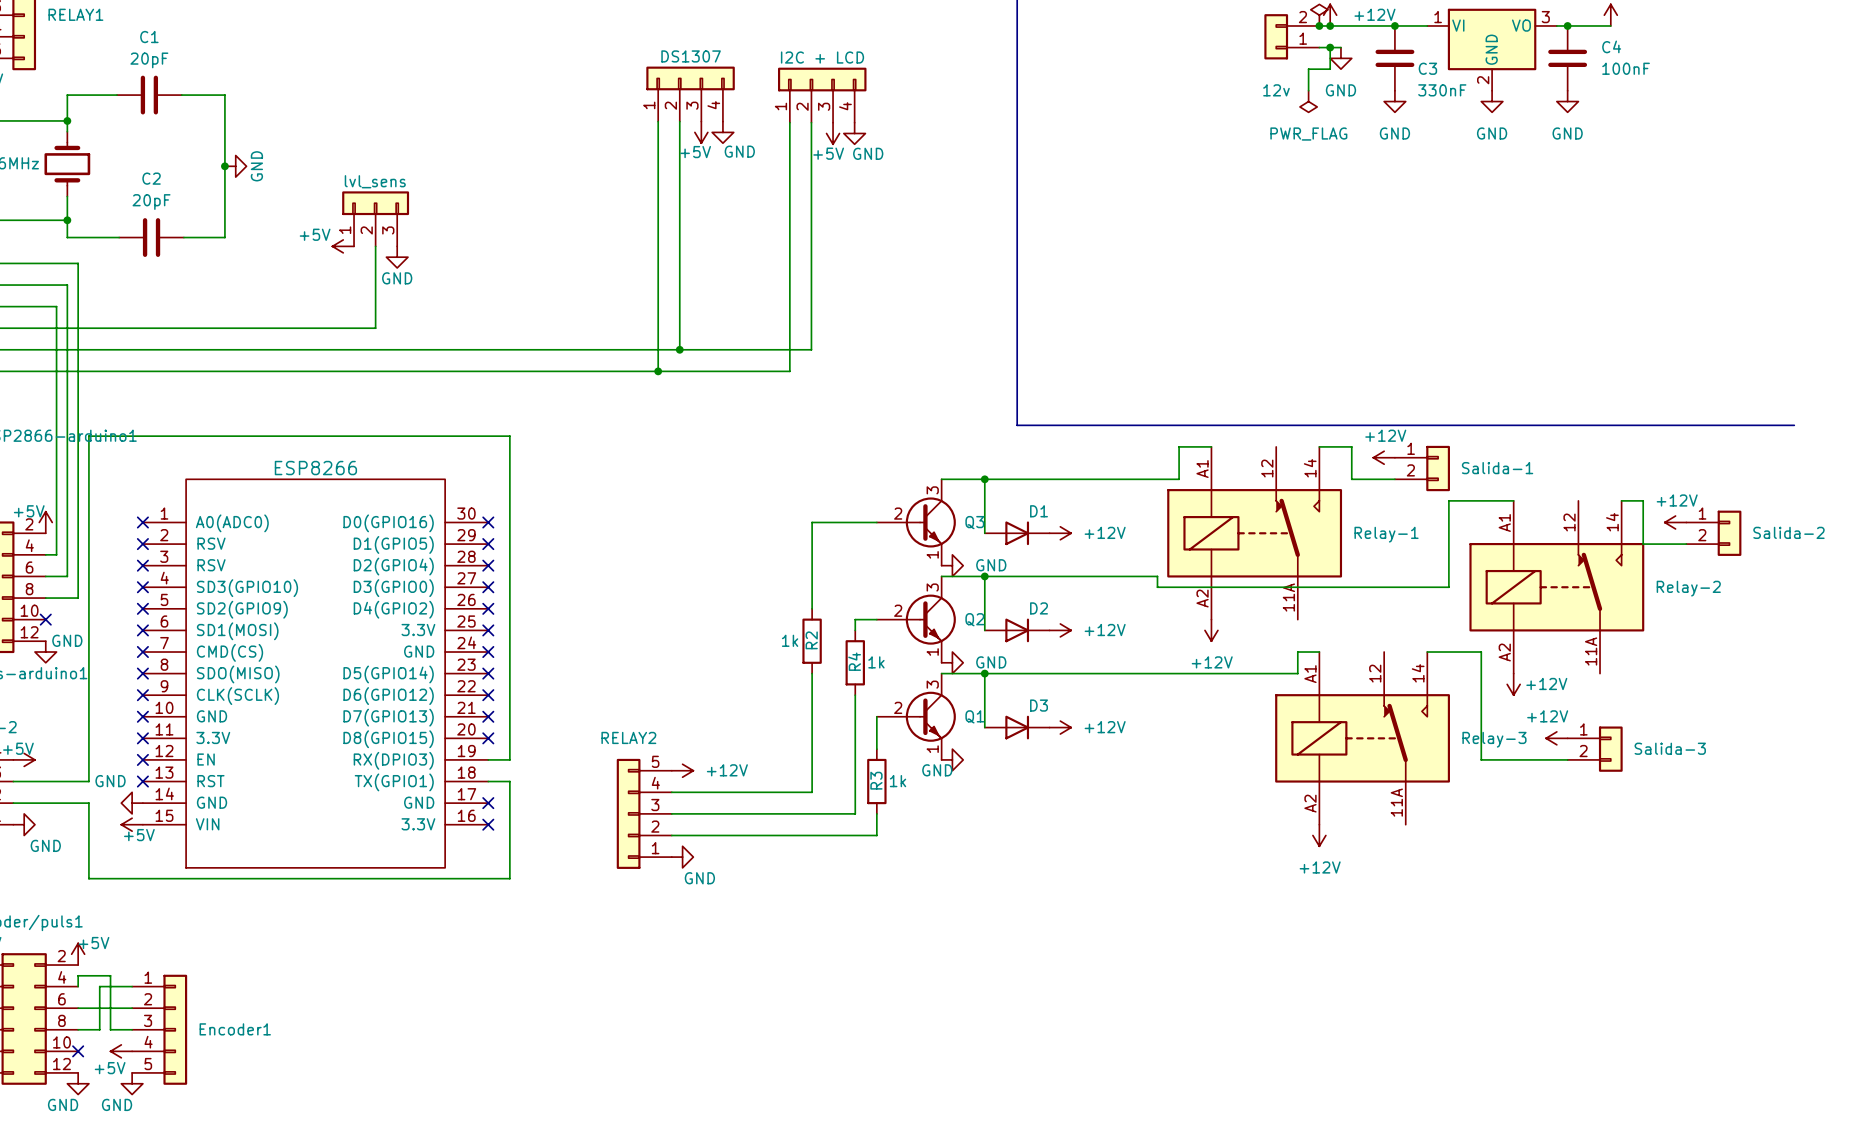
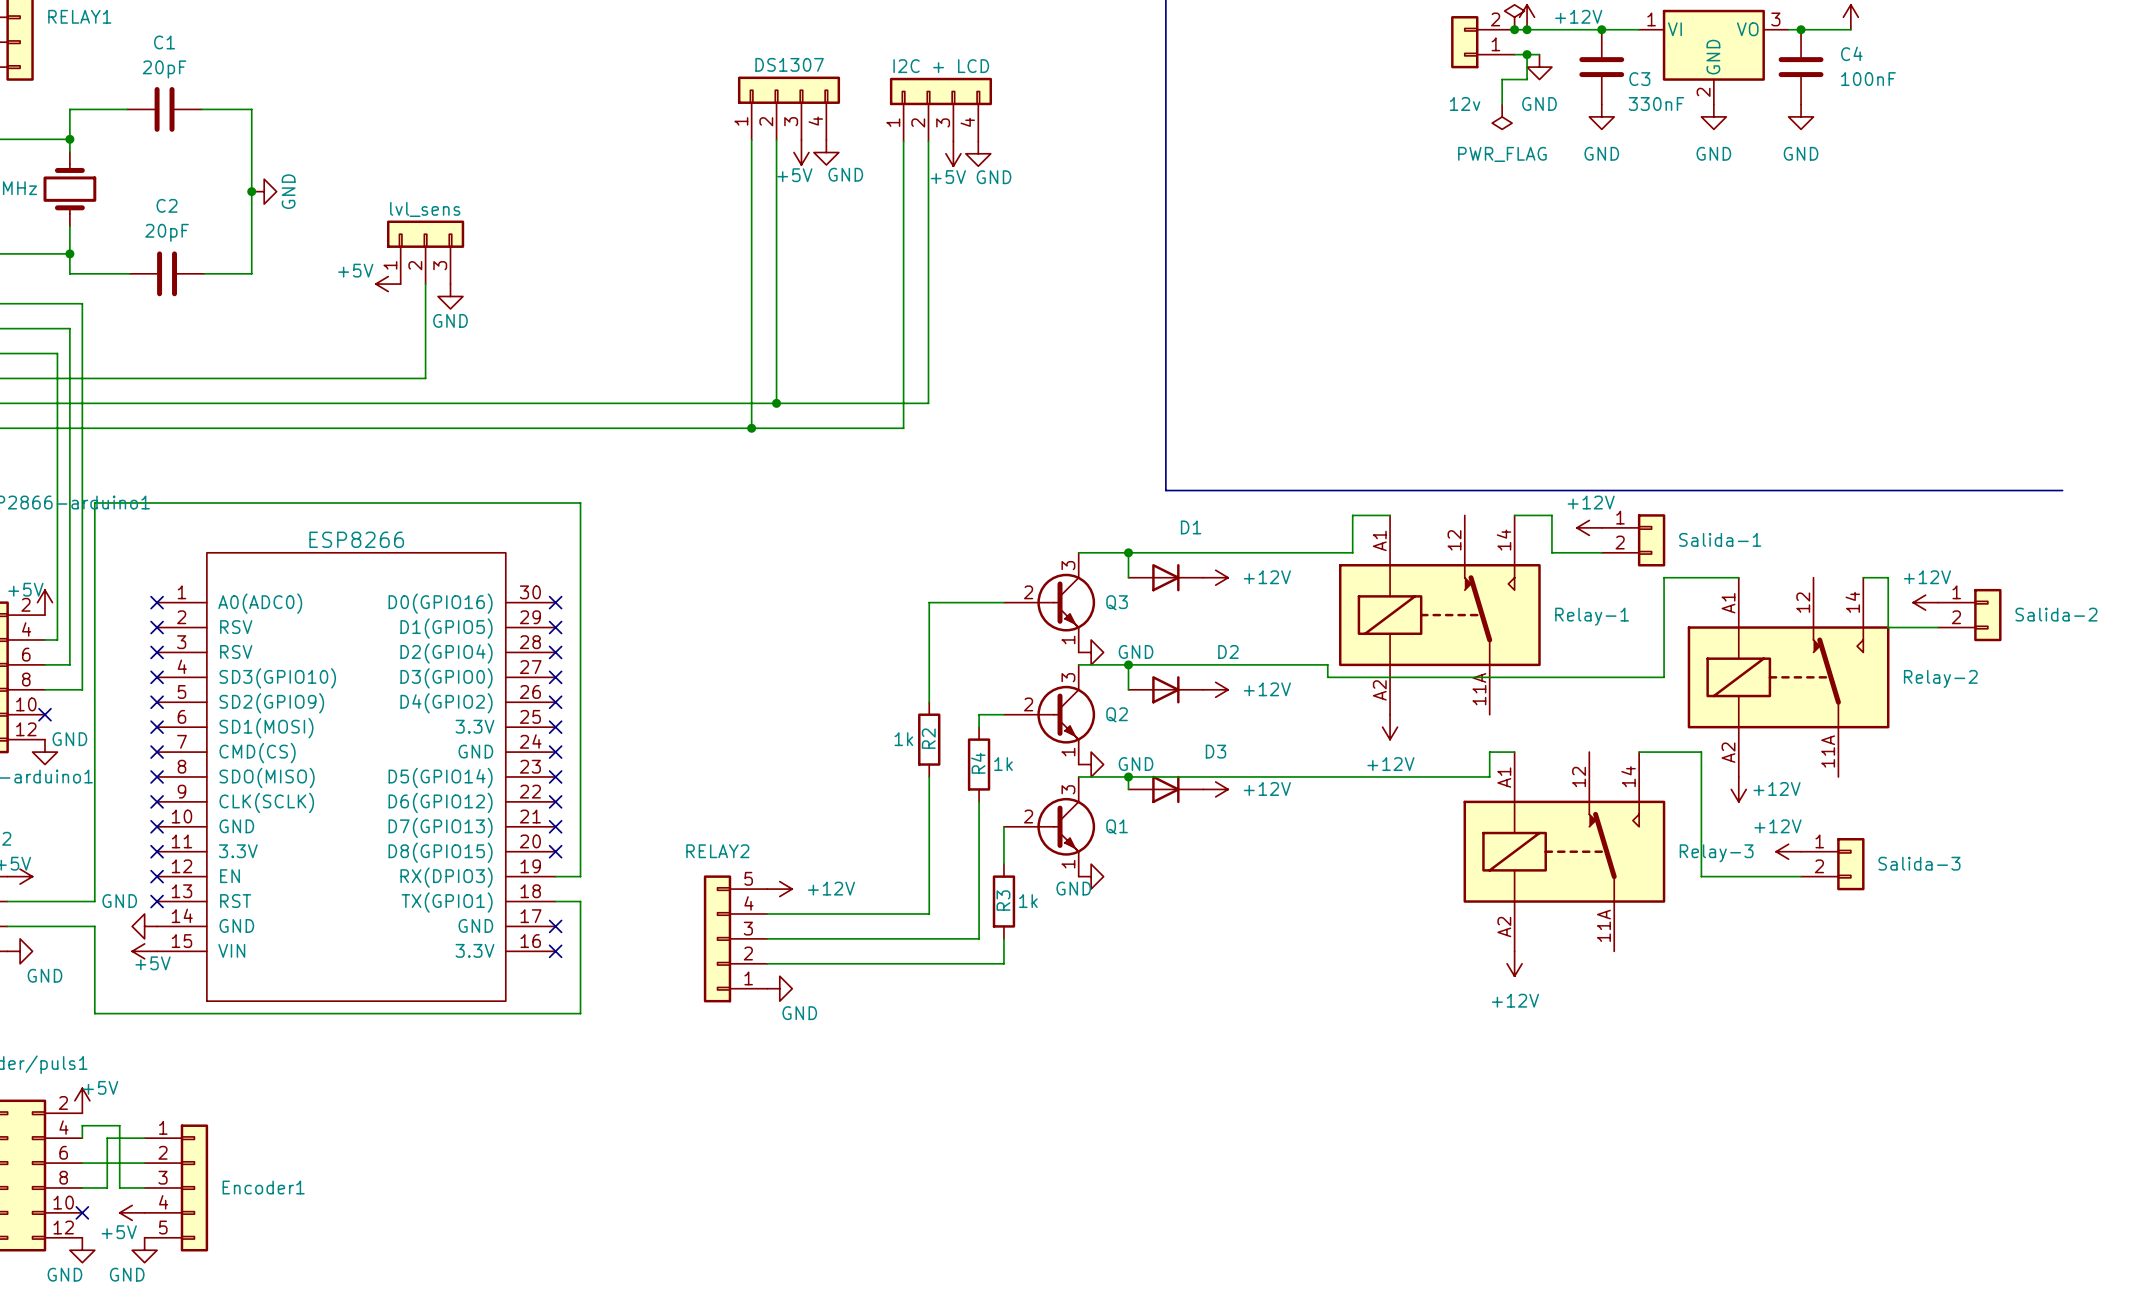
wire: (984, 500) (984, 533) -> none
power symbol: none -> +12V (1215, 577)
D1 name position: D1 (1039, 511) -> D1 (1191, 527)
D1 position: (1017, 533) -> (1165, 577)
power symbol: +12V (1060, 533) -> none
wire: (984, 598) (984, 630) -> none
power symbol: none -> +12V (1215, 689)
D2 name position: D2 (1039, 608) -> D2 (1228, 651)
D2 position: (1017, 630) -> (1165, 689)
power symbol: +12V (1060, 630) -> none
wire: (984, 684) (984, 727) -> none
power symbol: none -> +12V (1215, 789)
D3 name position: D3 (1039, 705) -> D3 (1215, 751)
D3 position: (1017, 727) -> (1165, 789)
power symbol: +12V (1060, 727) -> none

